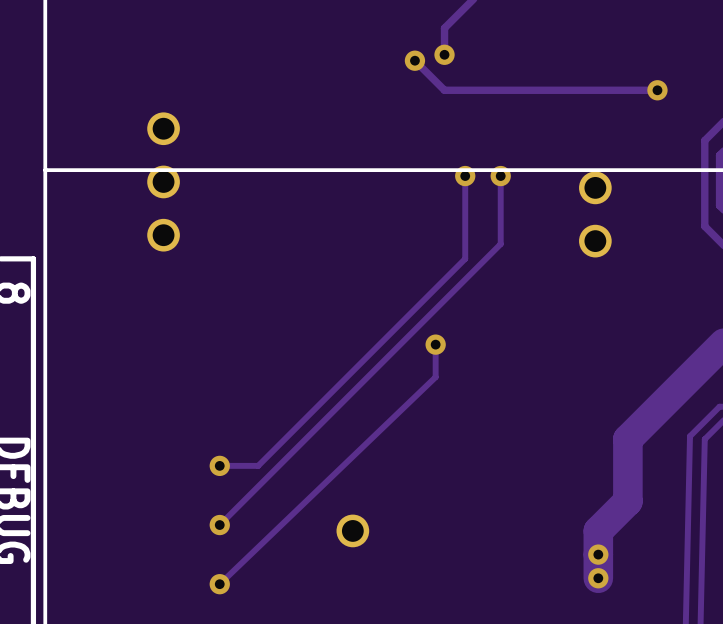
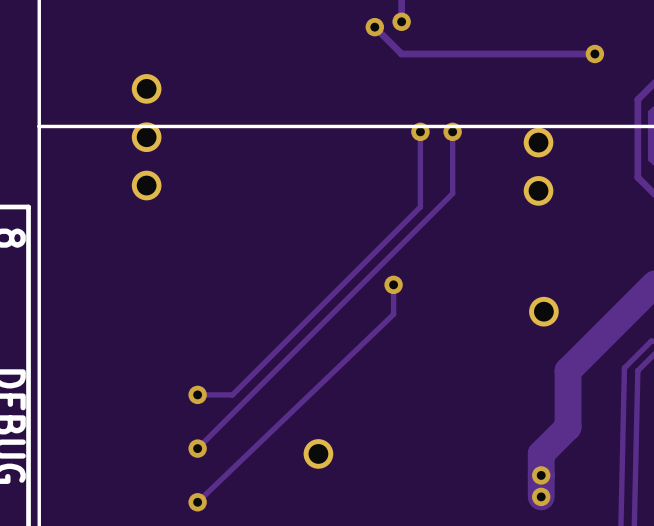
part: none -> (543, 311)

